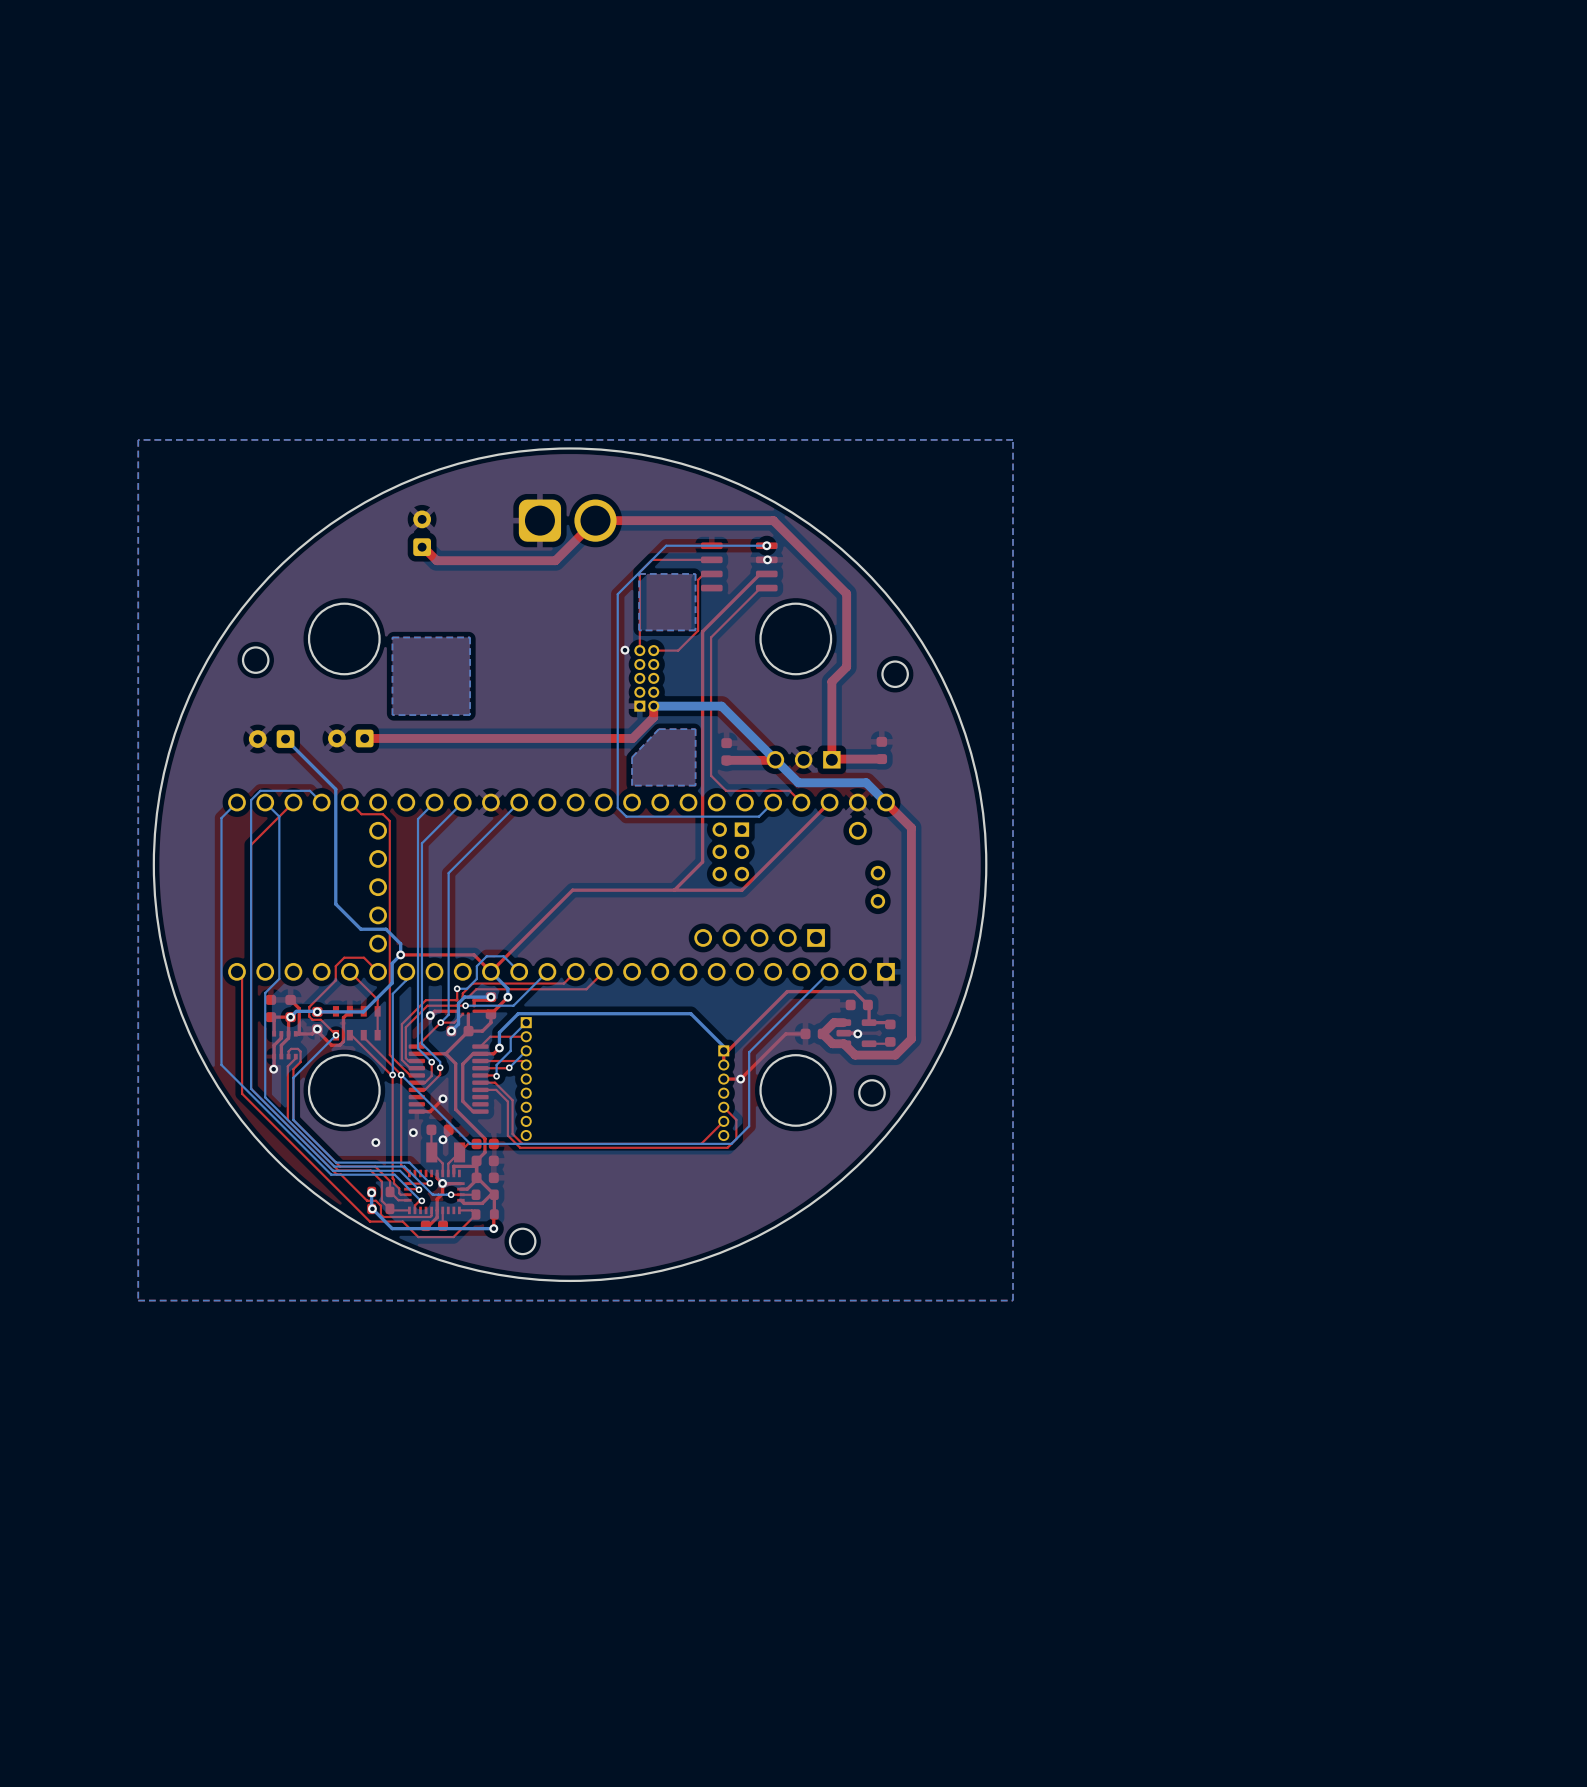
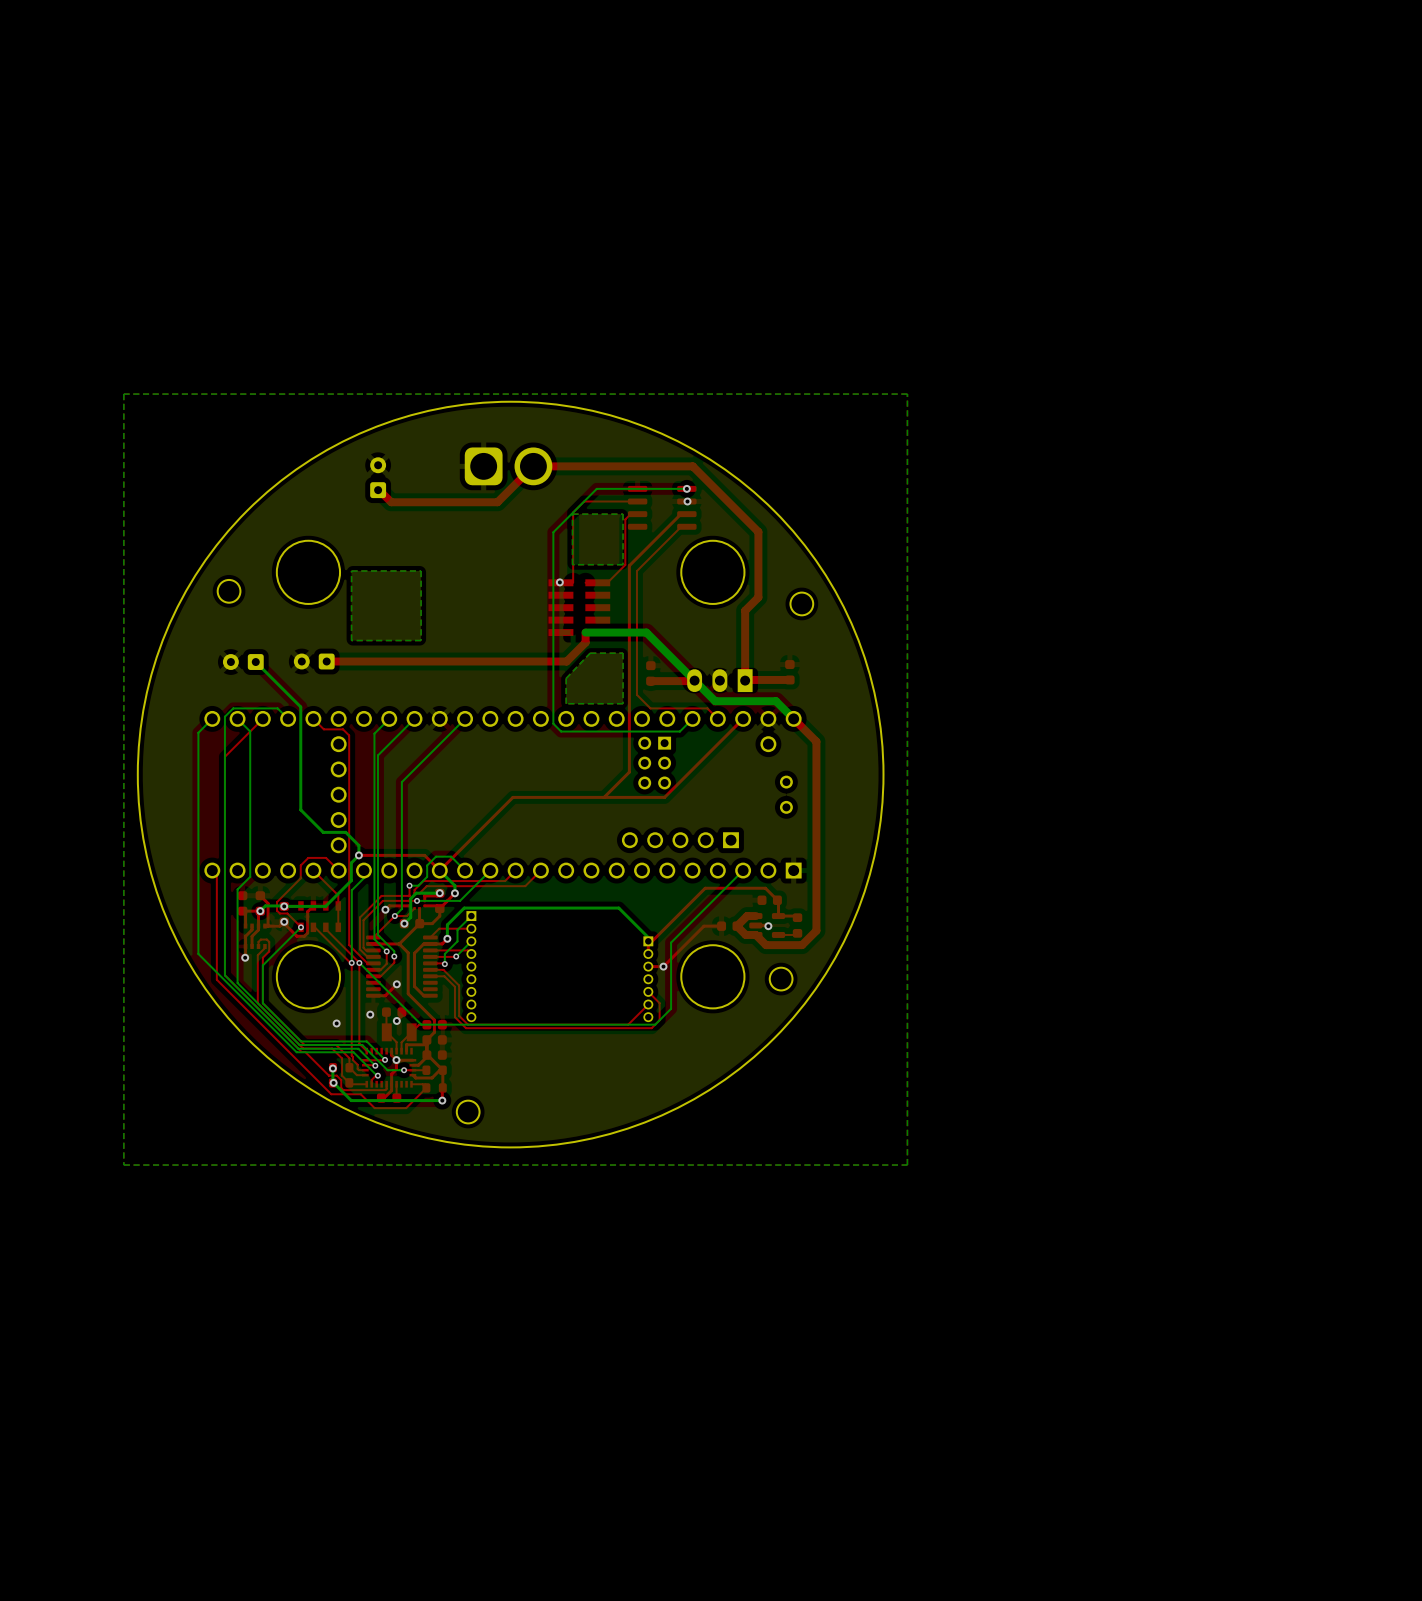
part footprint: [634, 645, 660, 712] -> [548, 579, 611, 637]
part footprint: [766, 751, 841, 769] -> [687, 669, 753, 693]

